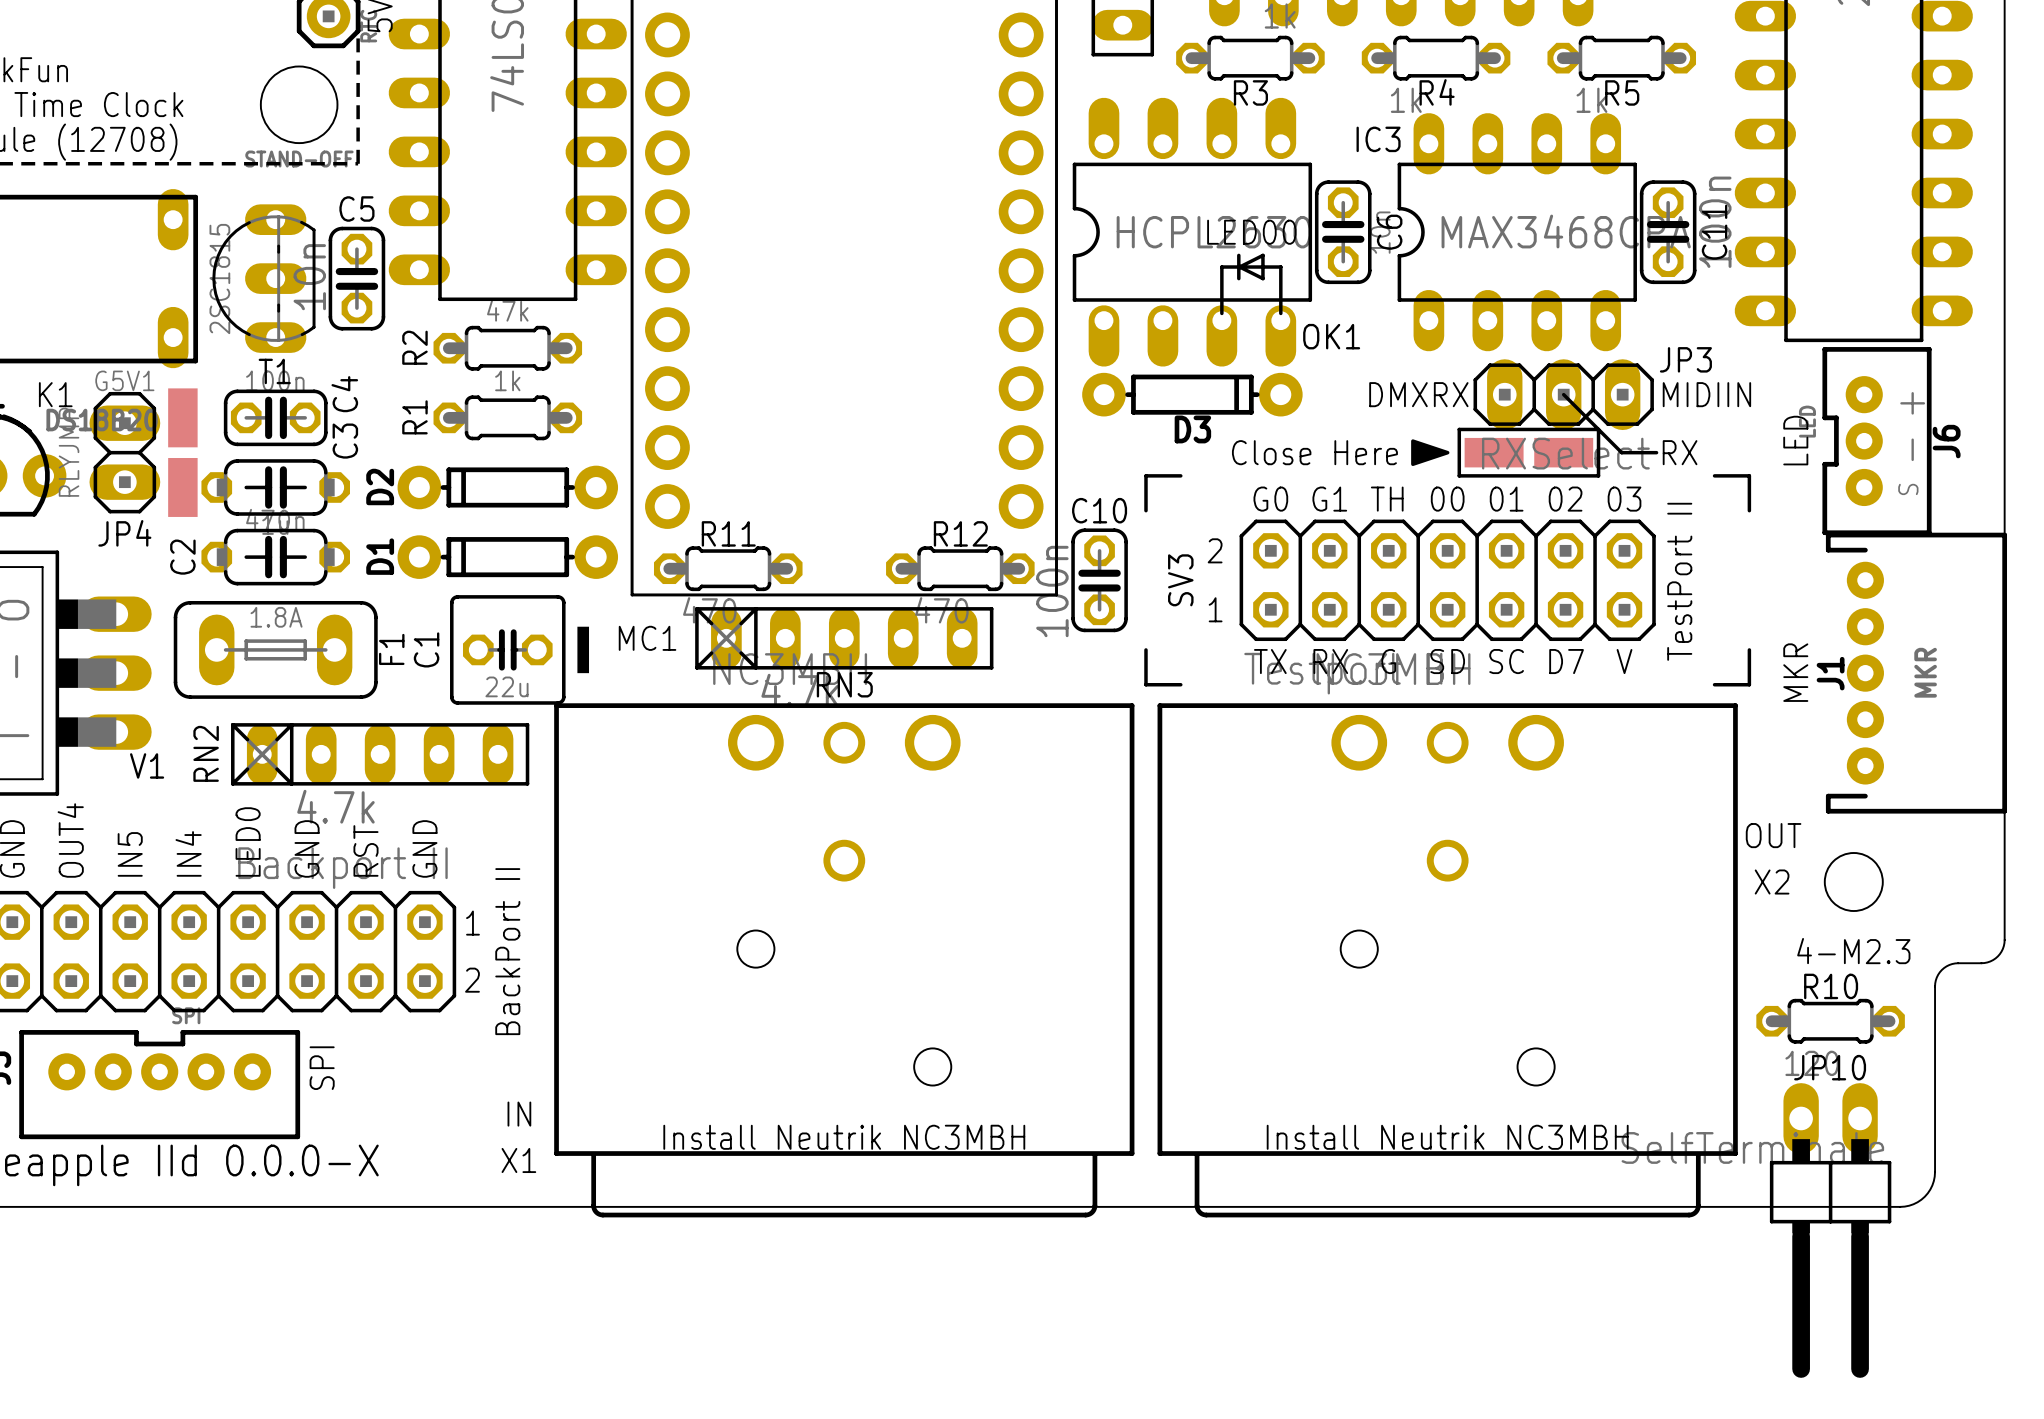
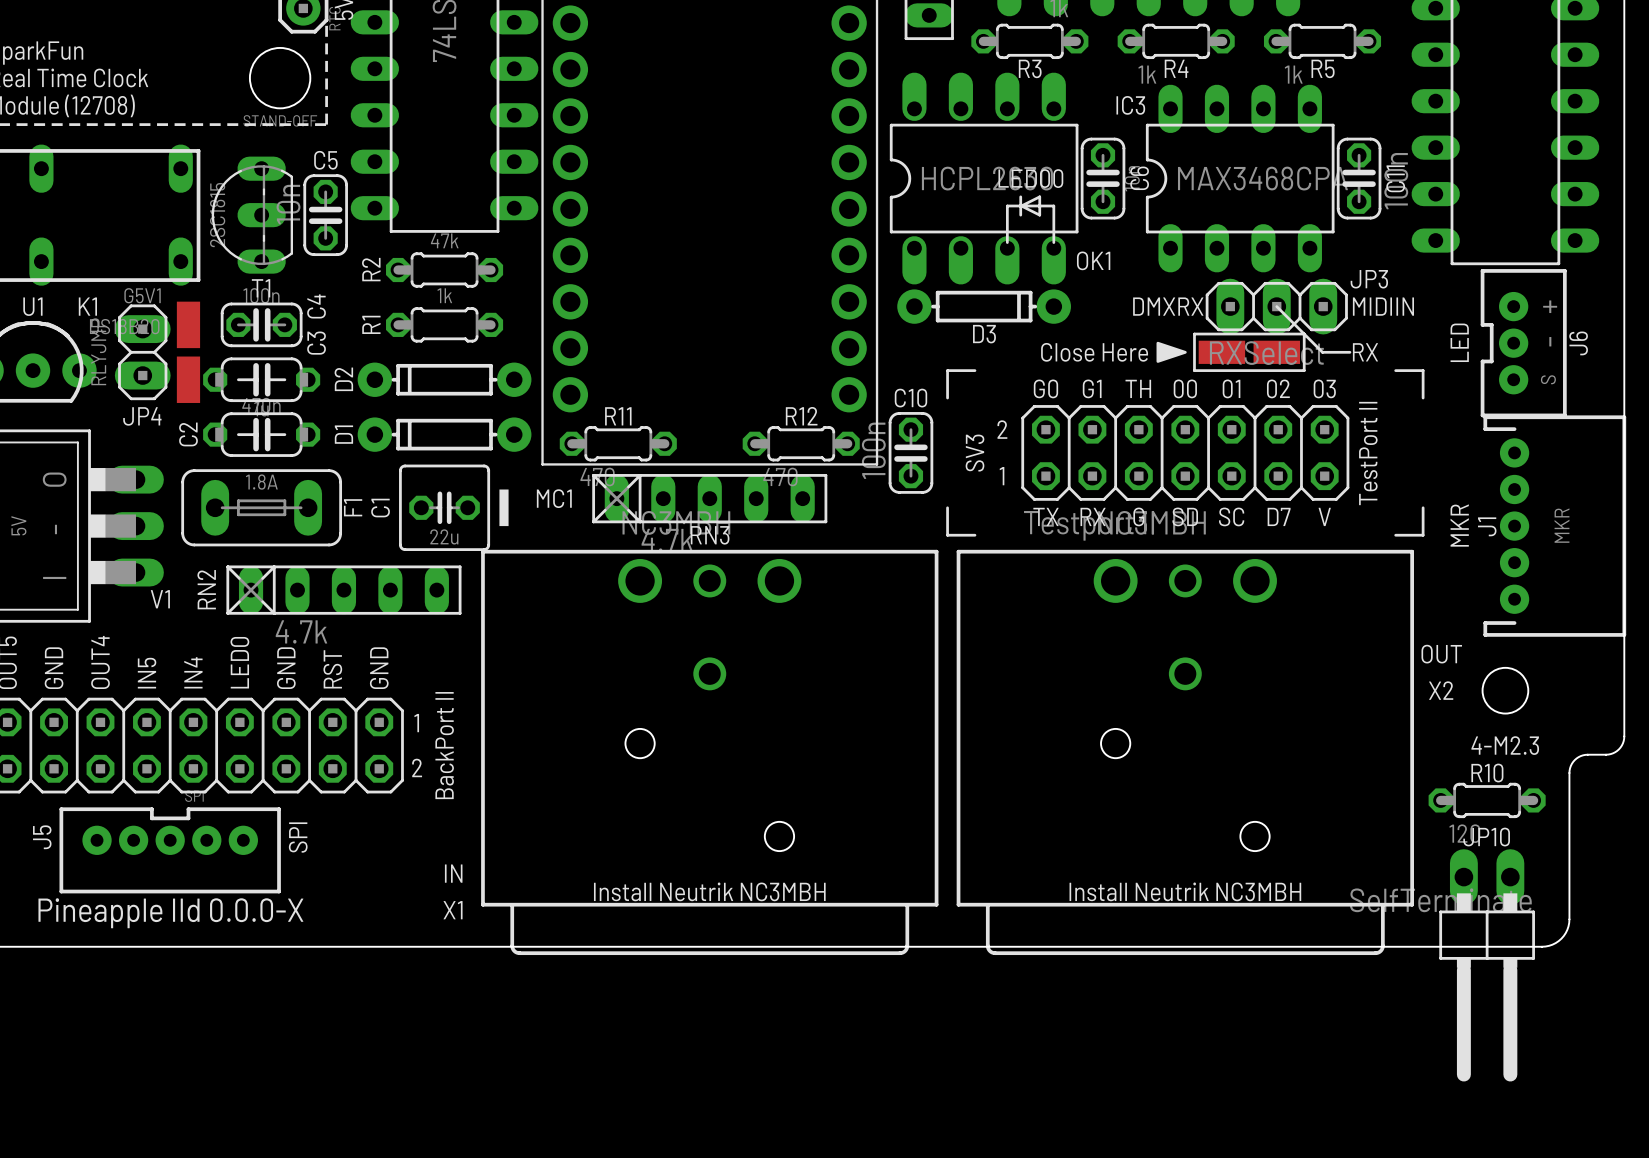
J6 value: LED (1807, 421) -> none
part value: Backport II (342, 868) -> none

